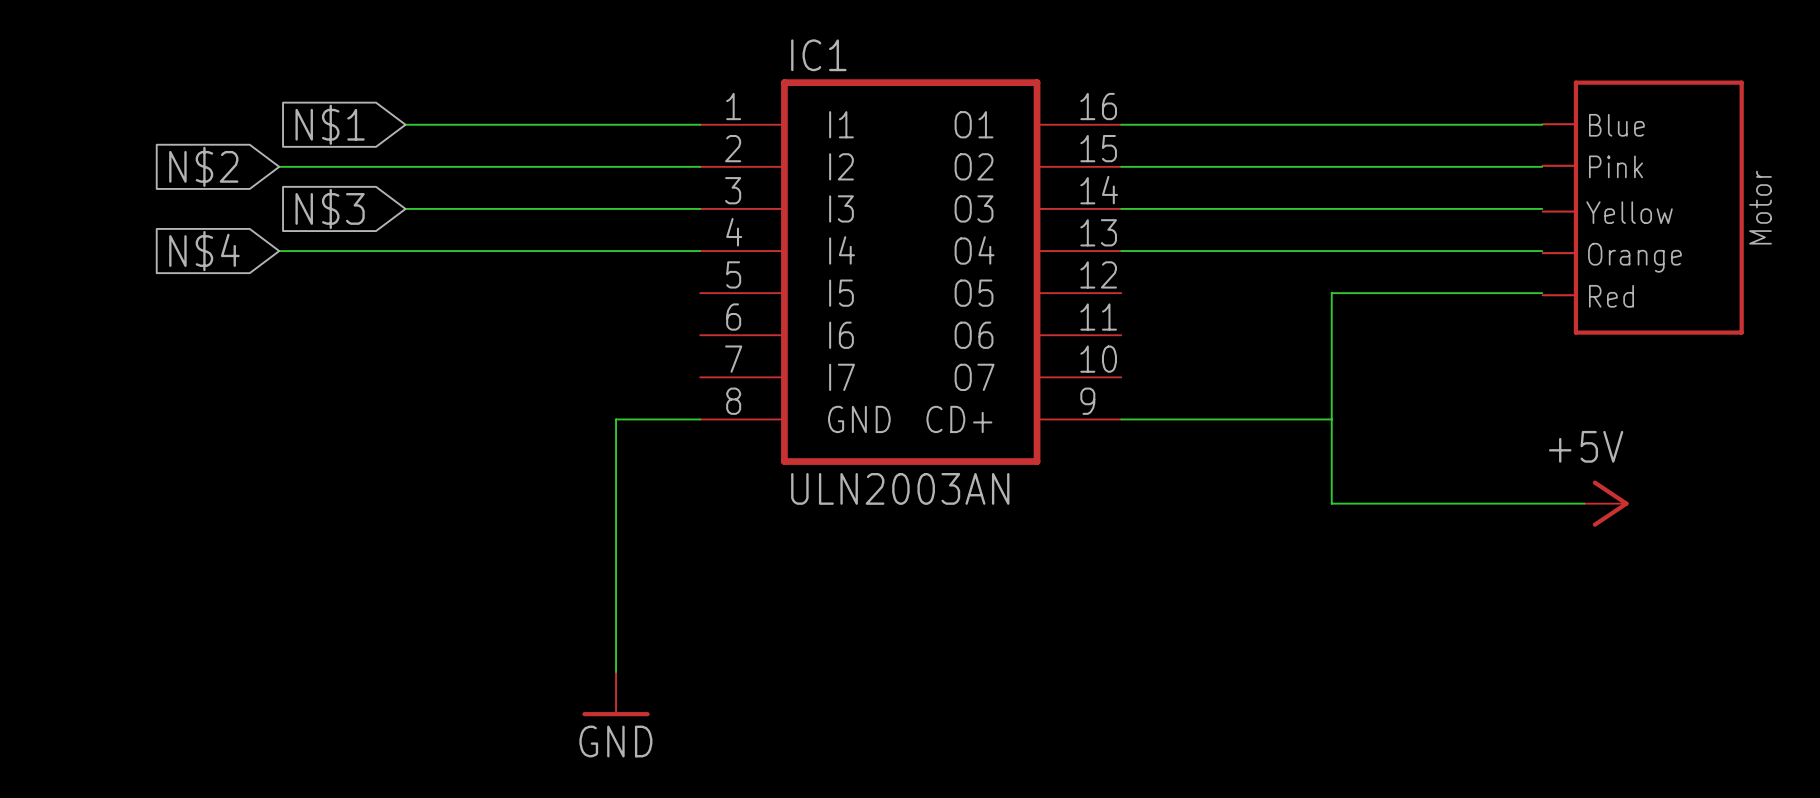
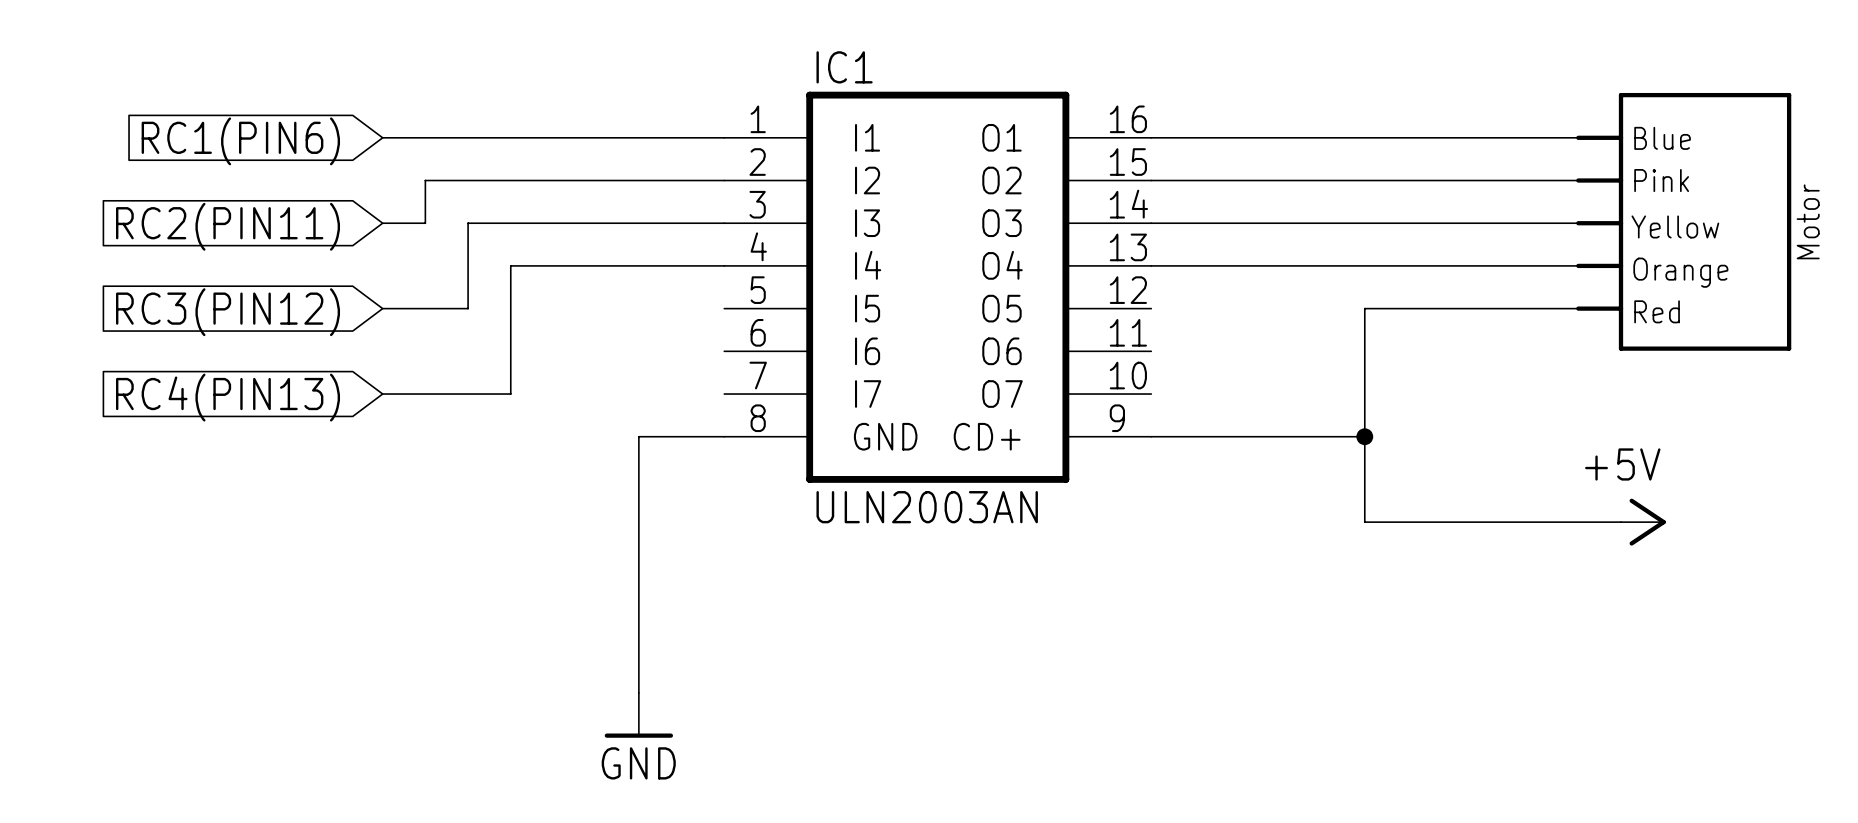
part symbol: [1541, 80, 1744, 335] -> [1576, 92, 1792, 351]
global label: N$1 (330, 124) -> none
wire: none -> (382, 137) (425, 137)
global label: none -> RC1(PIN6) (240, 141)
global label: N$2 (203, 166) -> none
wire: (279, 166) (405, 166) -> (382, 223) (425, 223) (425, 180)
global label: N$3 (330, 208) -> none
wire: (405, 208) (447, 208) -> (382, 308) (468, 308) (468, 223)
global label: none -> RC2(PIN11) (228, 226)
global label: N$4 (204, 251) -> none
wire: (279, 251) (489, 251) -> (382, 394) (510, 394) (510, 265)
global label: none -> RC3(PIN12) (228, 312)
global label: none -> RC4(PIN13) (228, 397)
junction: none -> (1364, 436)

